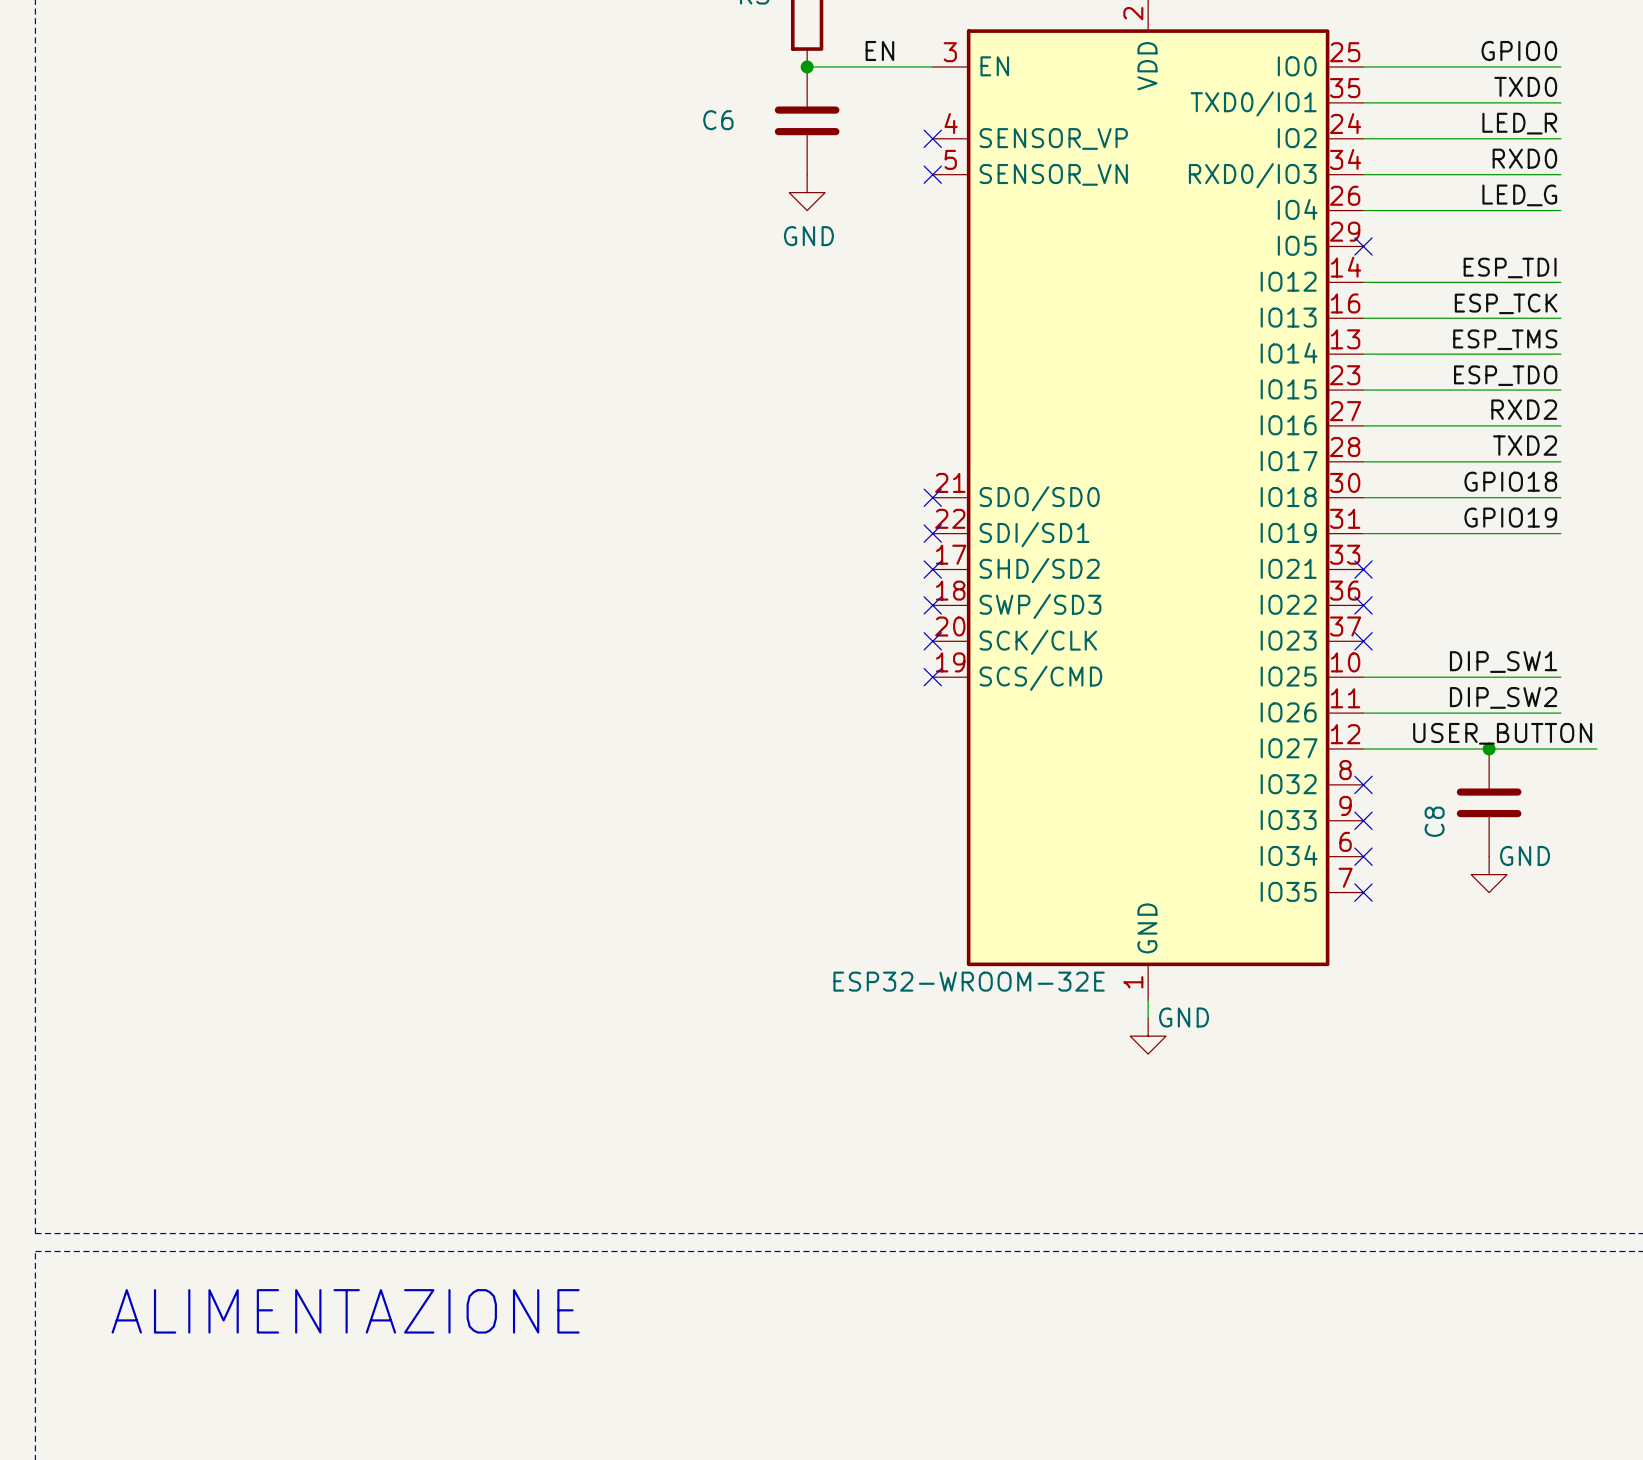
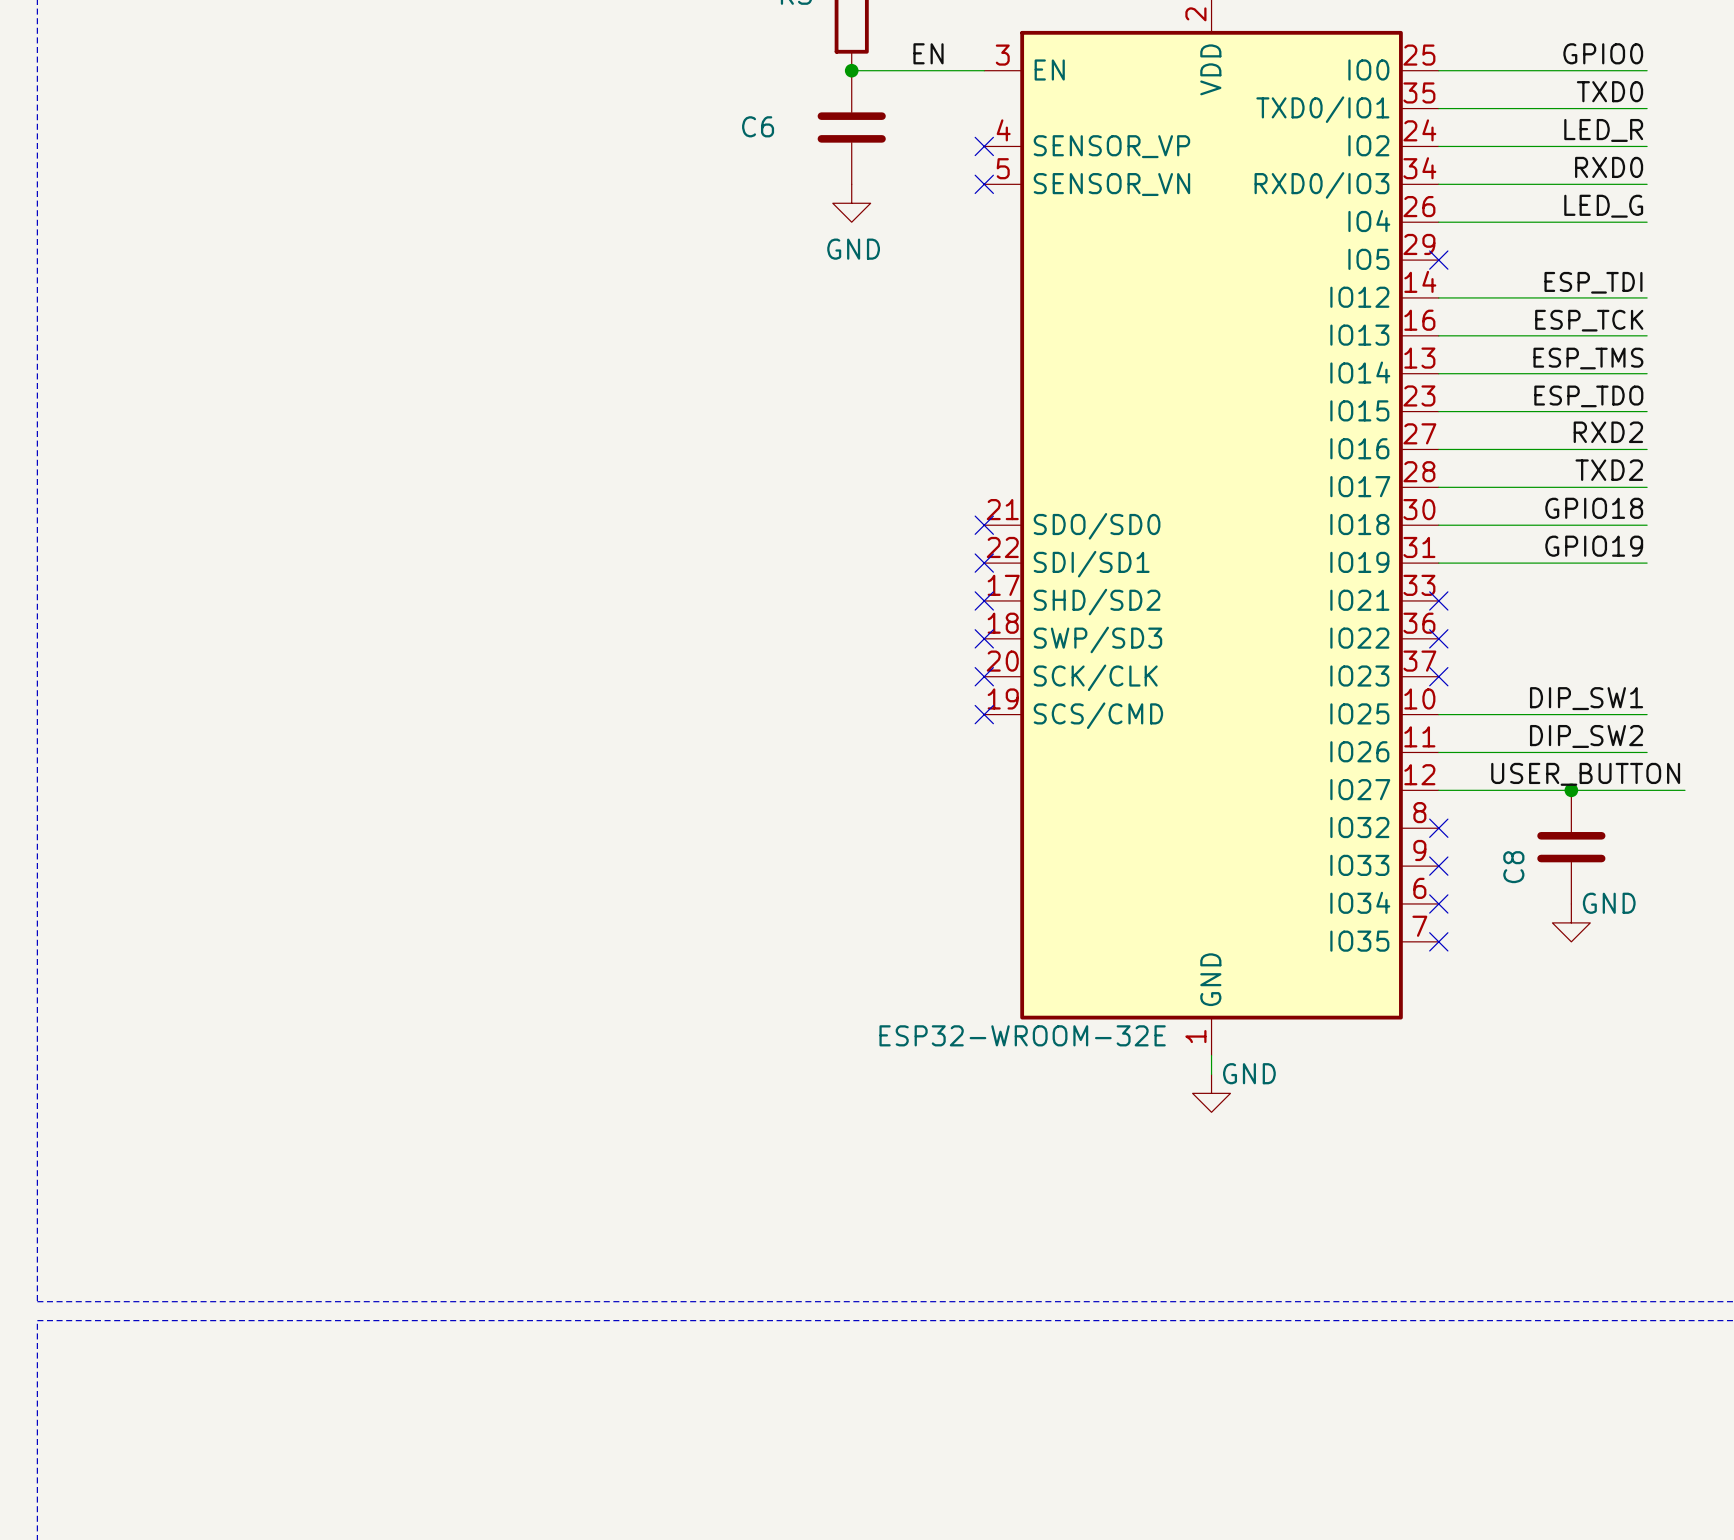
text: ALIMENTAZIONE (345, 1311) -> none

